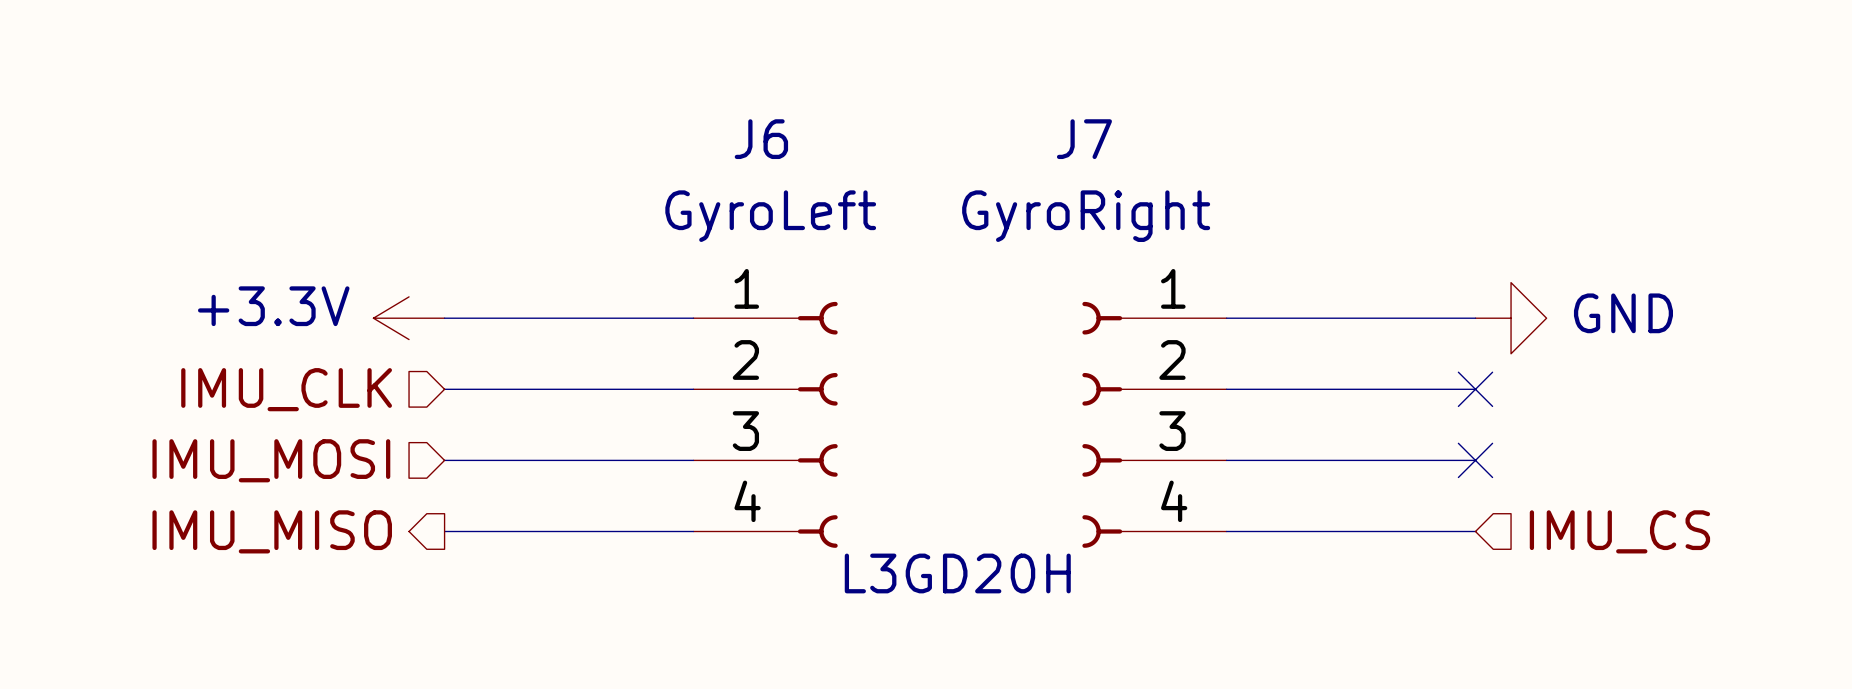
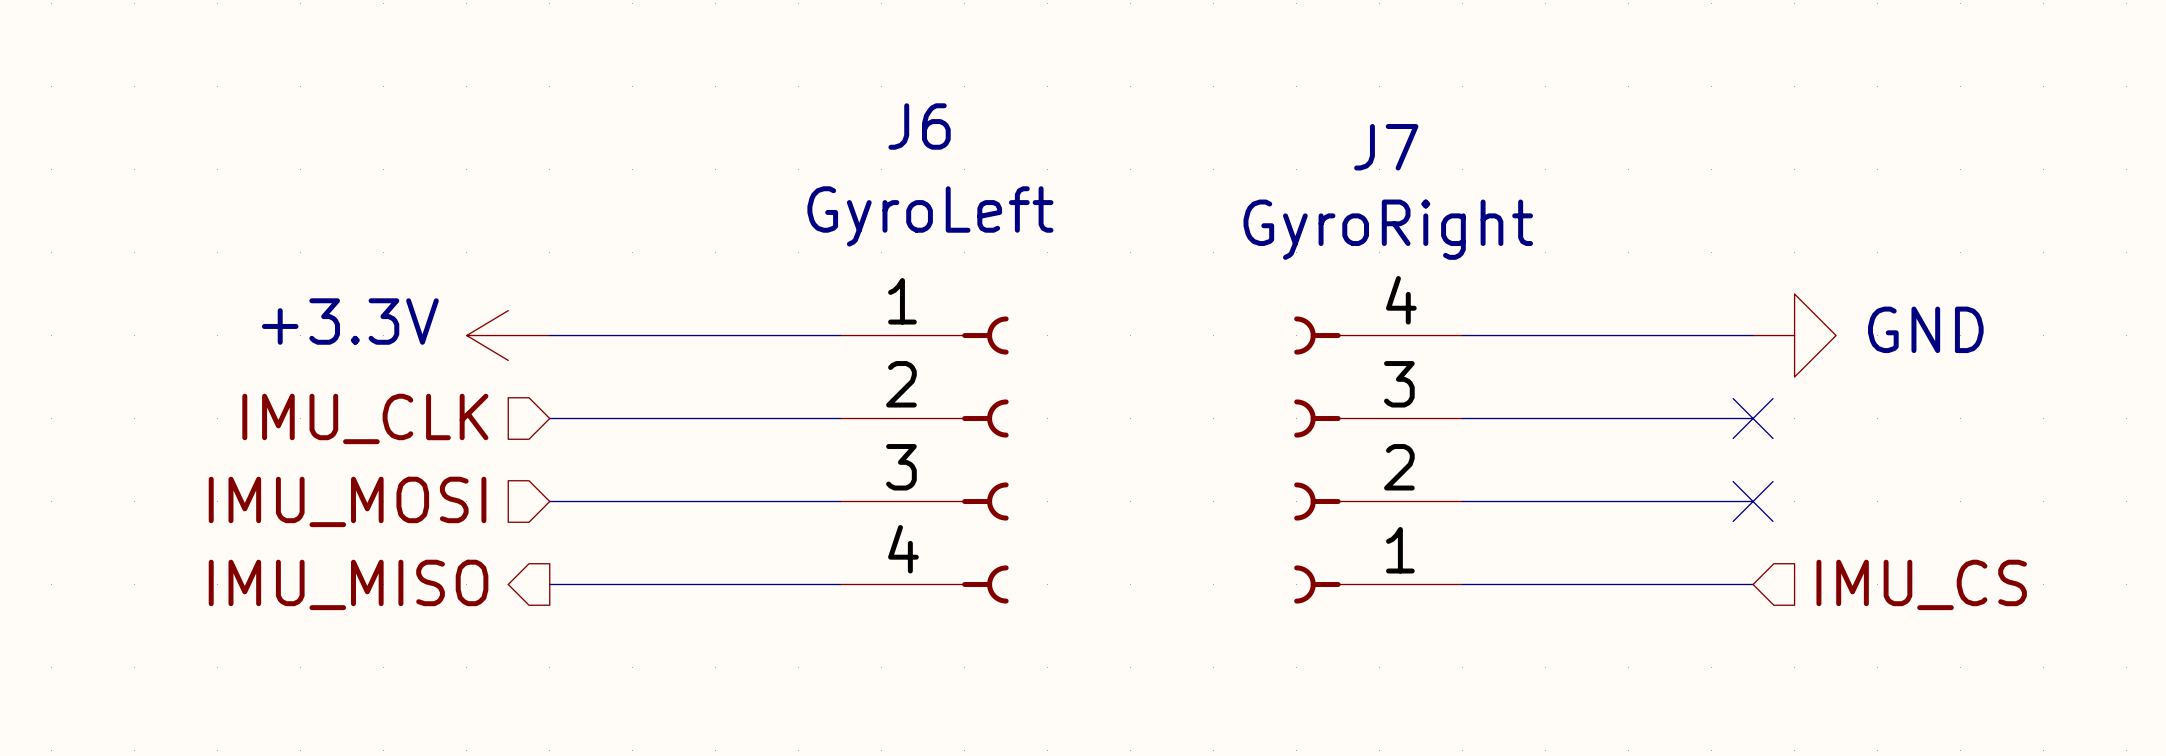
J7 name position: J7 (1084, 139) -> J7 (1386, 147)
J7 value position: GyroRight (1086, 216) -> GyroRight (1388, 229)
J7 flip: as is (1102, 424) -> up-down (1317, 460)
text: L3GD20H (957, 573) -> none

